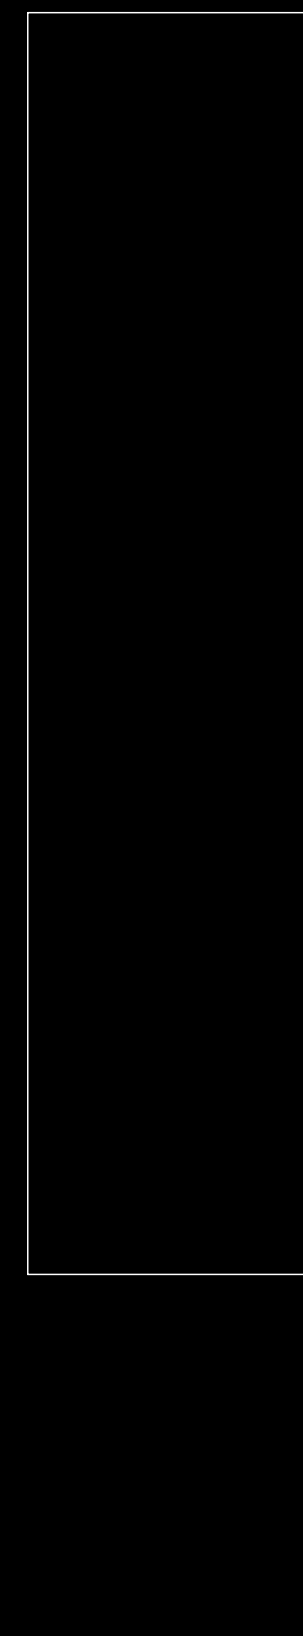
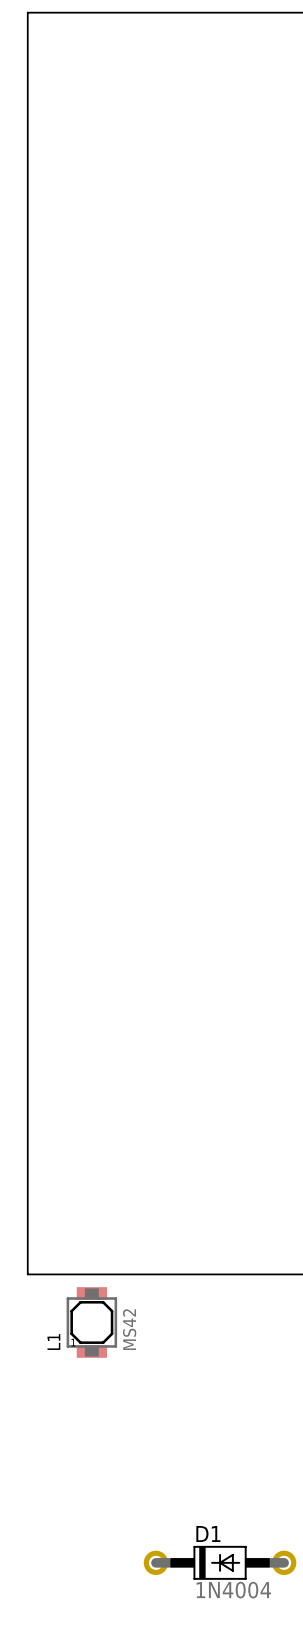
L1: none -> MS42 (91, 1322)
D1: none -> 1N4004 (220, 1562)

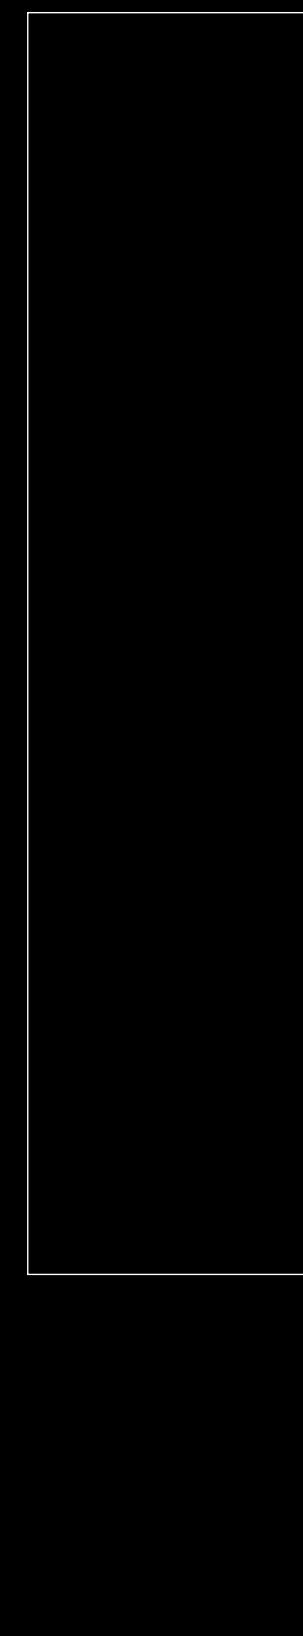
L1: MS42 (91, 1322) -> none
D1: 1N4004 (220, 1562) -> none

